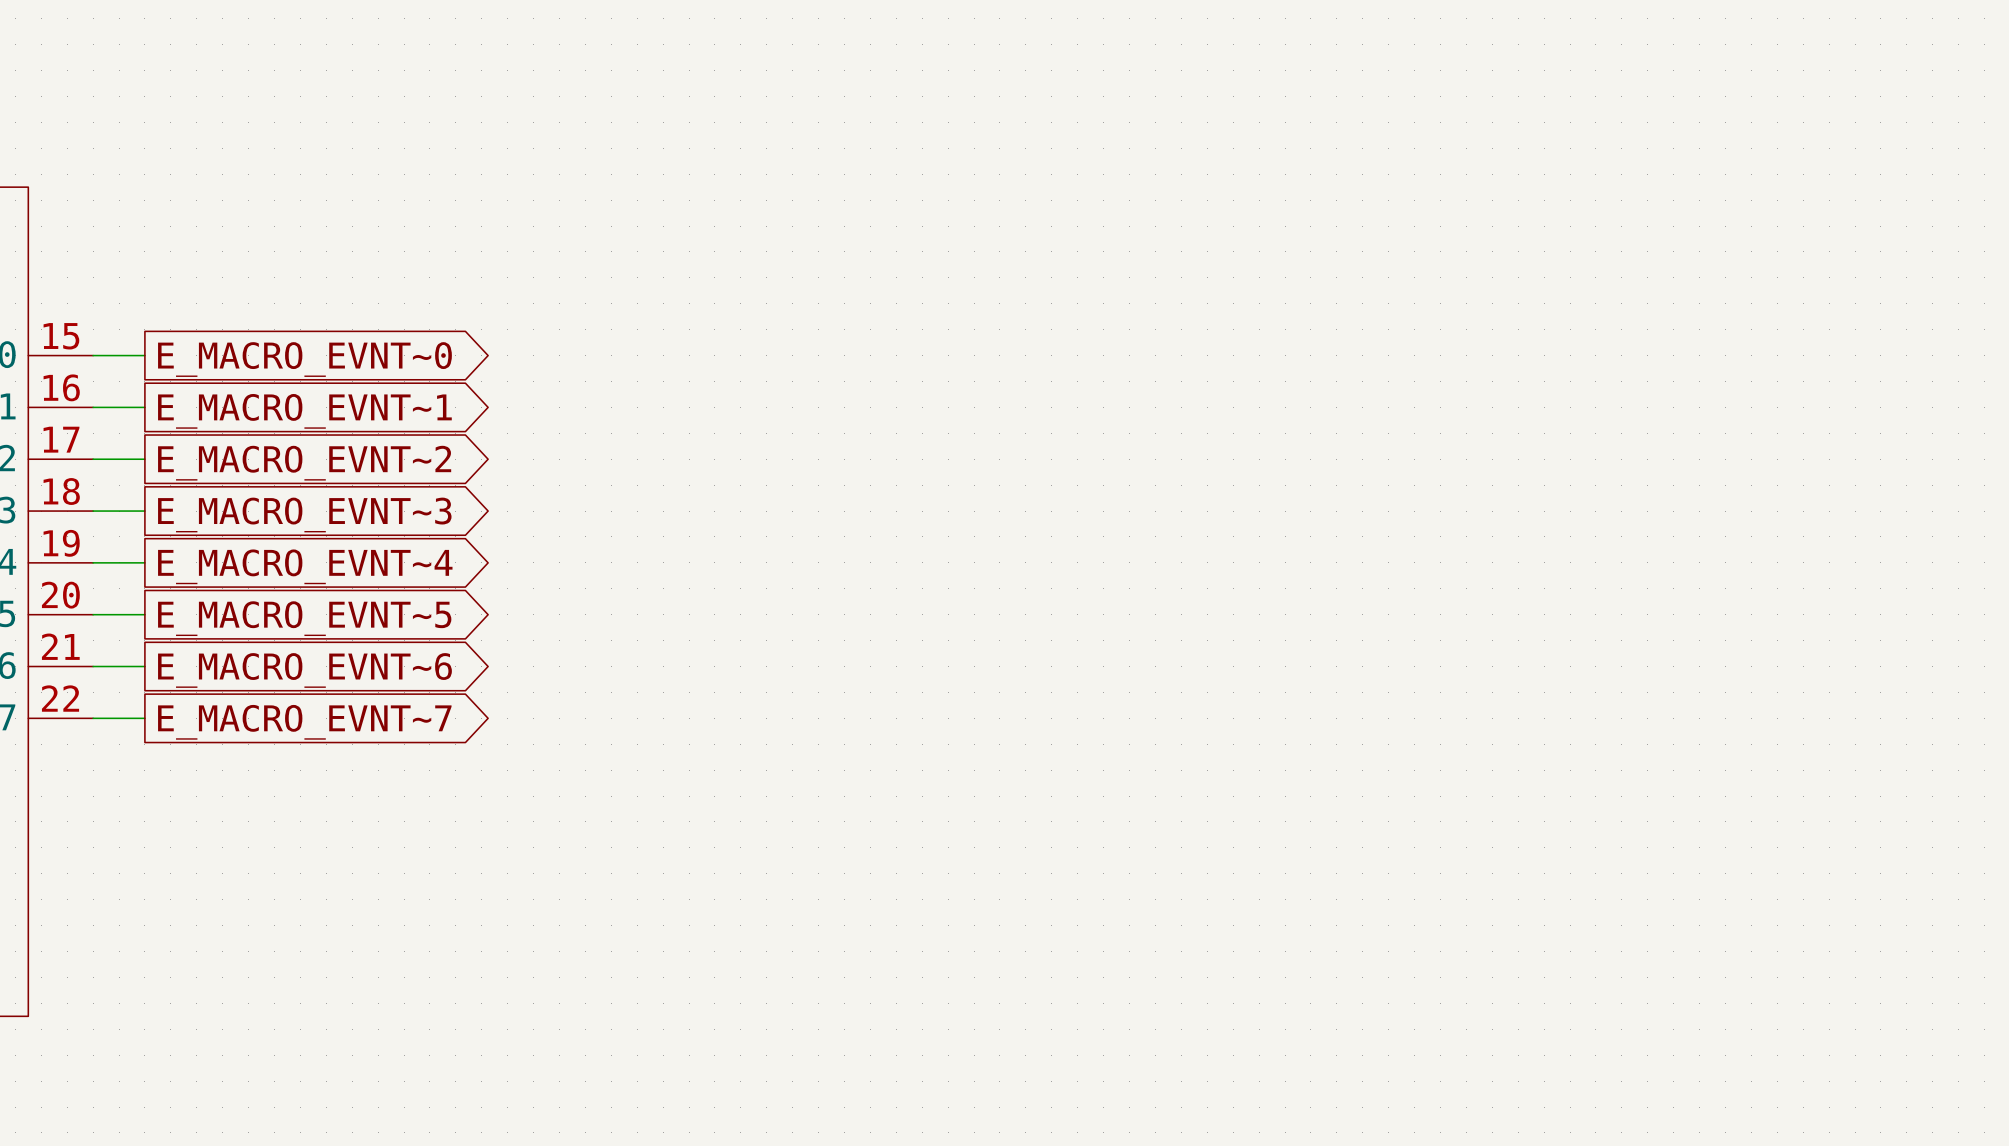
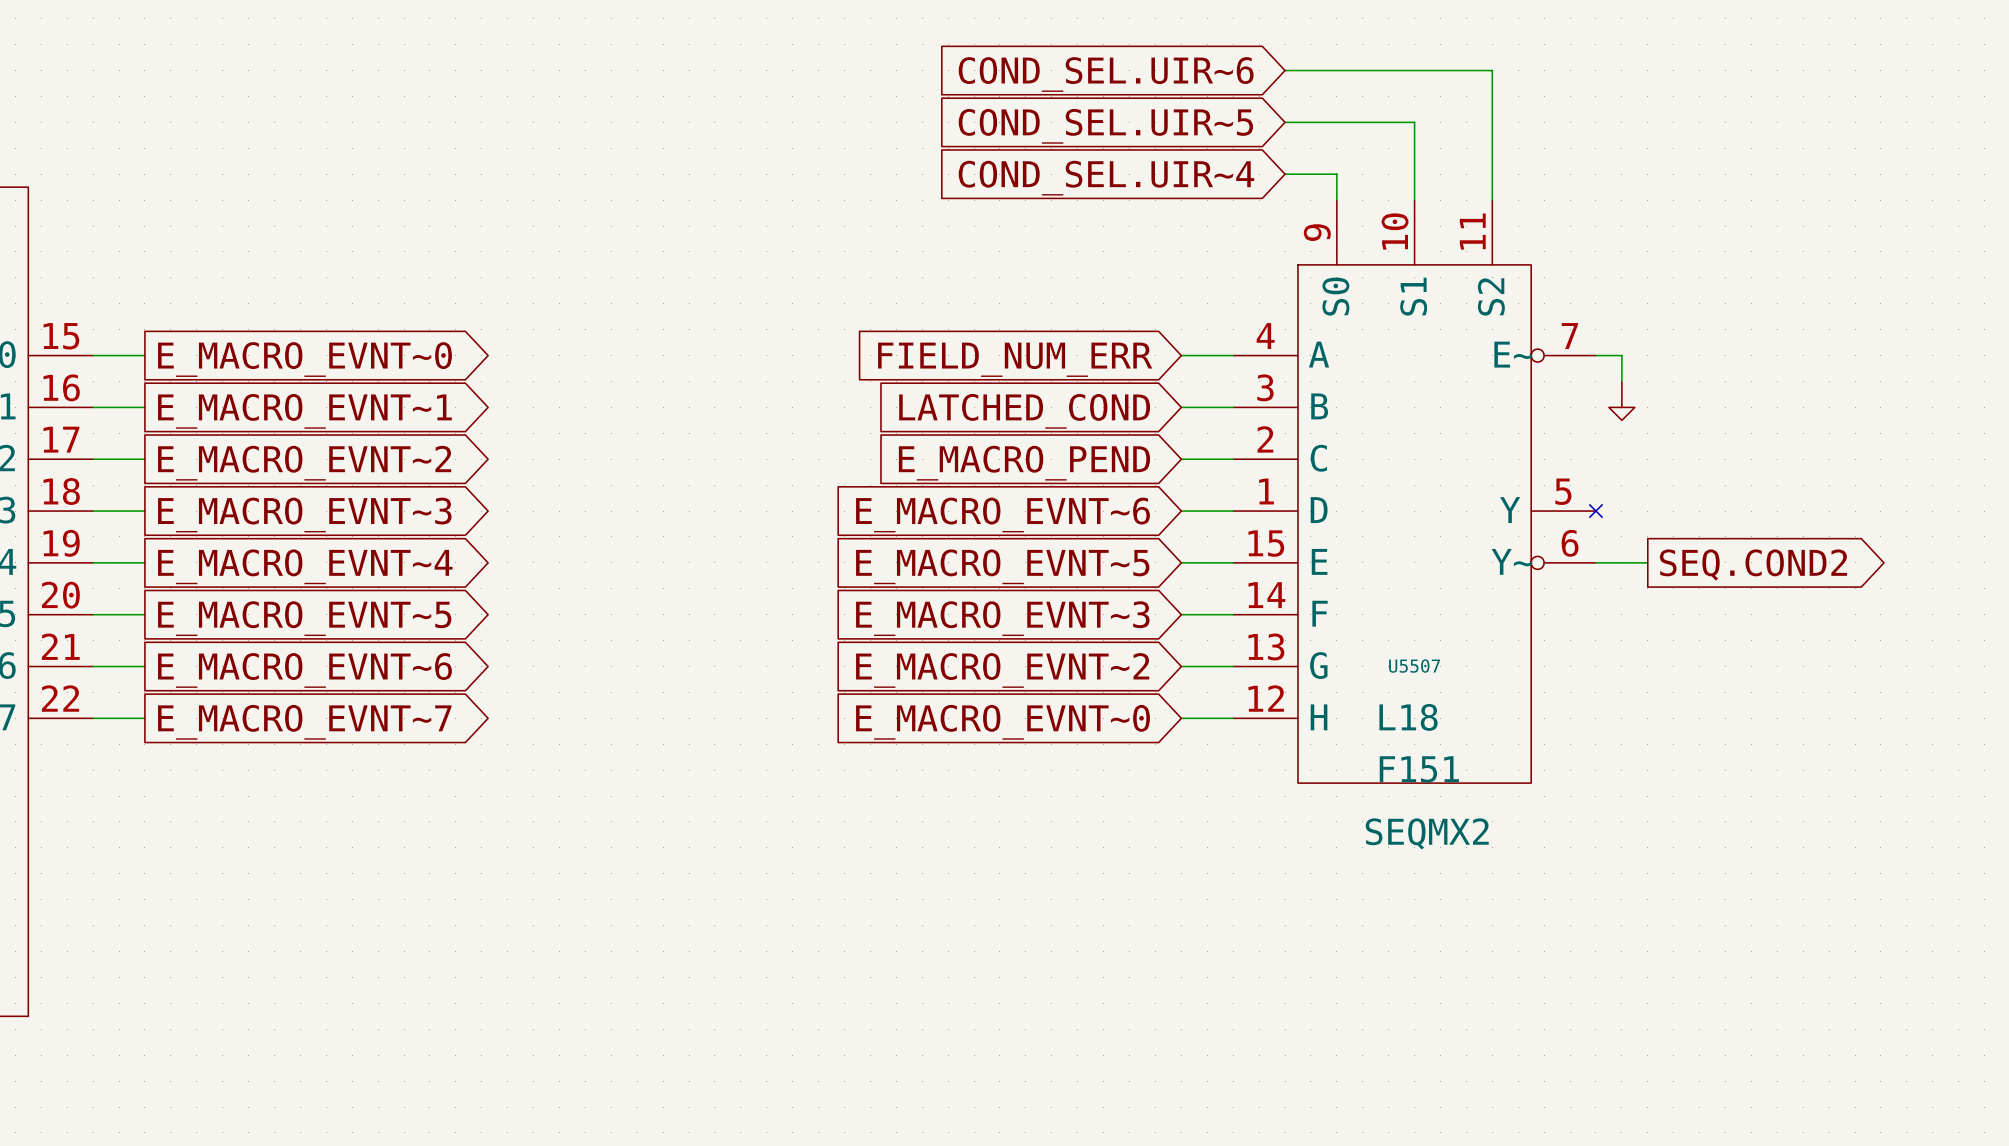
wire: none -> (1285, 70) (1492, 70) (1492, 200)
global label: none -> COND_SEL.UIR~6 (1106, 74)
wire: none -> (1285, 122) (1414, 122) (1414, 200)
global label: none -> COND_SEL.UIR~5 (1105, 126)
wire: none -> (1285, 174) (1336, 174) (1336, 200)
global label: none -> COND_SEL.UIR~4 (1106, 178)
wire: none -> (1181, 355) (1233, 355)
wire: none -> (1595, 355) (1621, 355) (1621, 381)
global label: none -> FIELD_NUM_ERR (1015, 359)
power symbol: none -> (1621, 401)
wire: none -> (1181, 407) (1233, 407)
global label: none -> LATCHED_COND (1024, 411)
wire: none -> (1181, 459) (1233, 459)
global label: none -> E_MACRO_PEND (1024, 463)
U5507: none -> F151 (1414, 491)
wire: none -> (1181, 511) (1233, 511)
no-connect mark: none -> (1595, 511)
global label: none -> E_MACRO_EVNT~6 (1003, 515)
wire: none -> (1181, 562) (1233, 562)
wire: none -> (1595, 562) (1647, 562)
global label: none -> SEQ.COND2 (1753, 564)
global label: none -> E_MACRO_EVNT~5 (1002, 566)
wire: none -> (1181, 614) (1233, 614)
global label: none -> E_MACRO_EVNT~3 (1002, 618)
wire: none -> (1181, 666) (1233, 666)
global label: none -> E_MACRO_EVNT~2 (1002, 670)
wire: none -> (1181, 718) (1233, 718)
global label: none -> E_MACRO_EVNT~0 (1003, 722)

